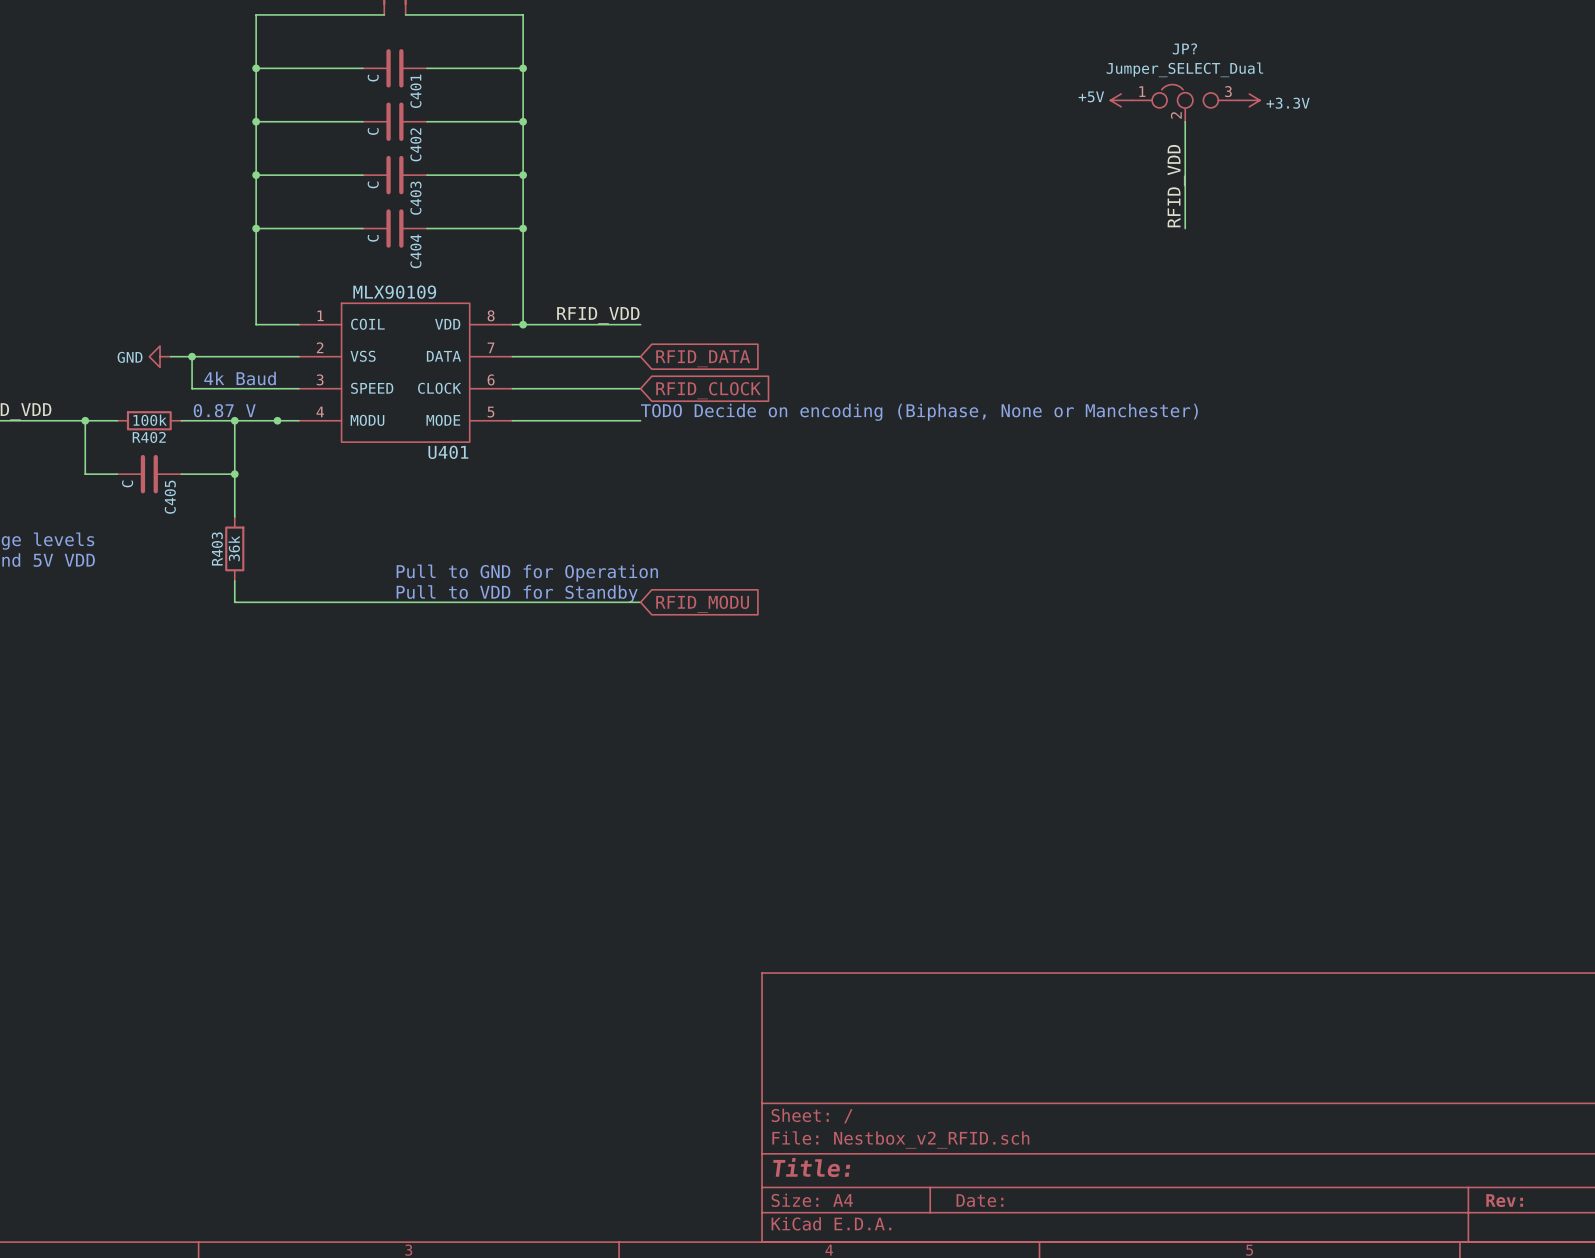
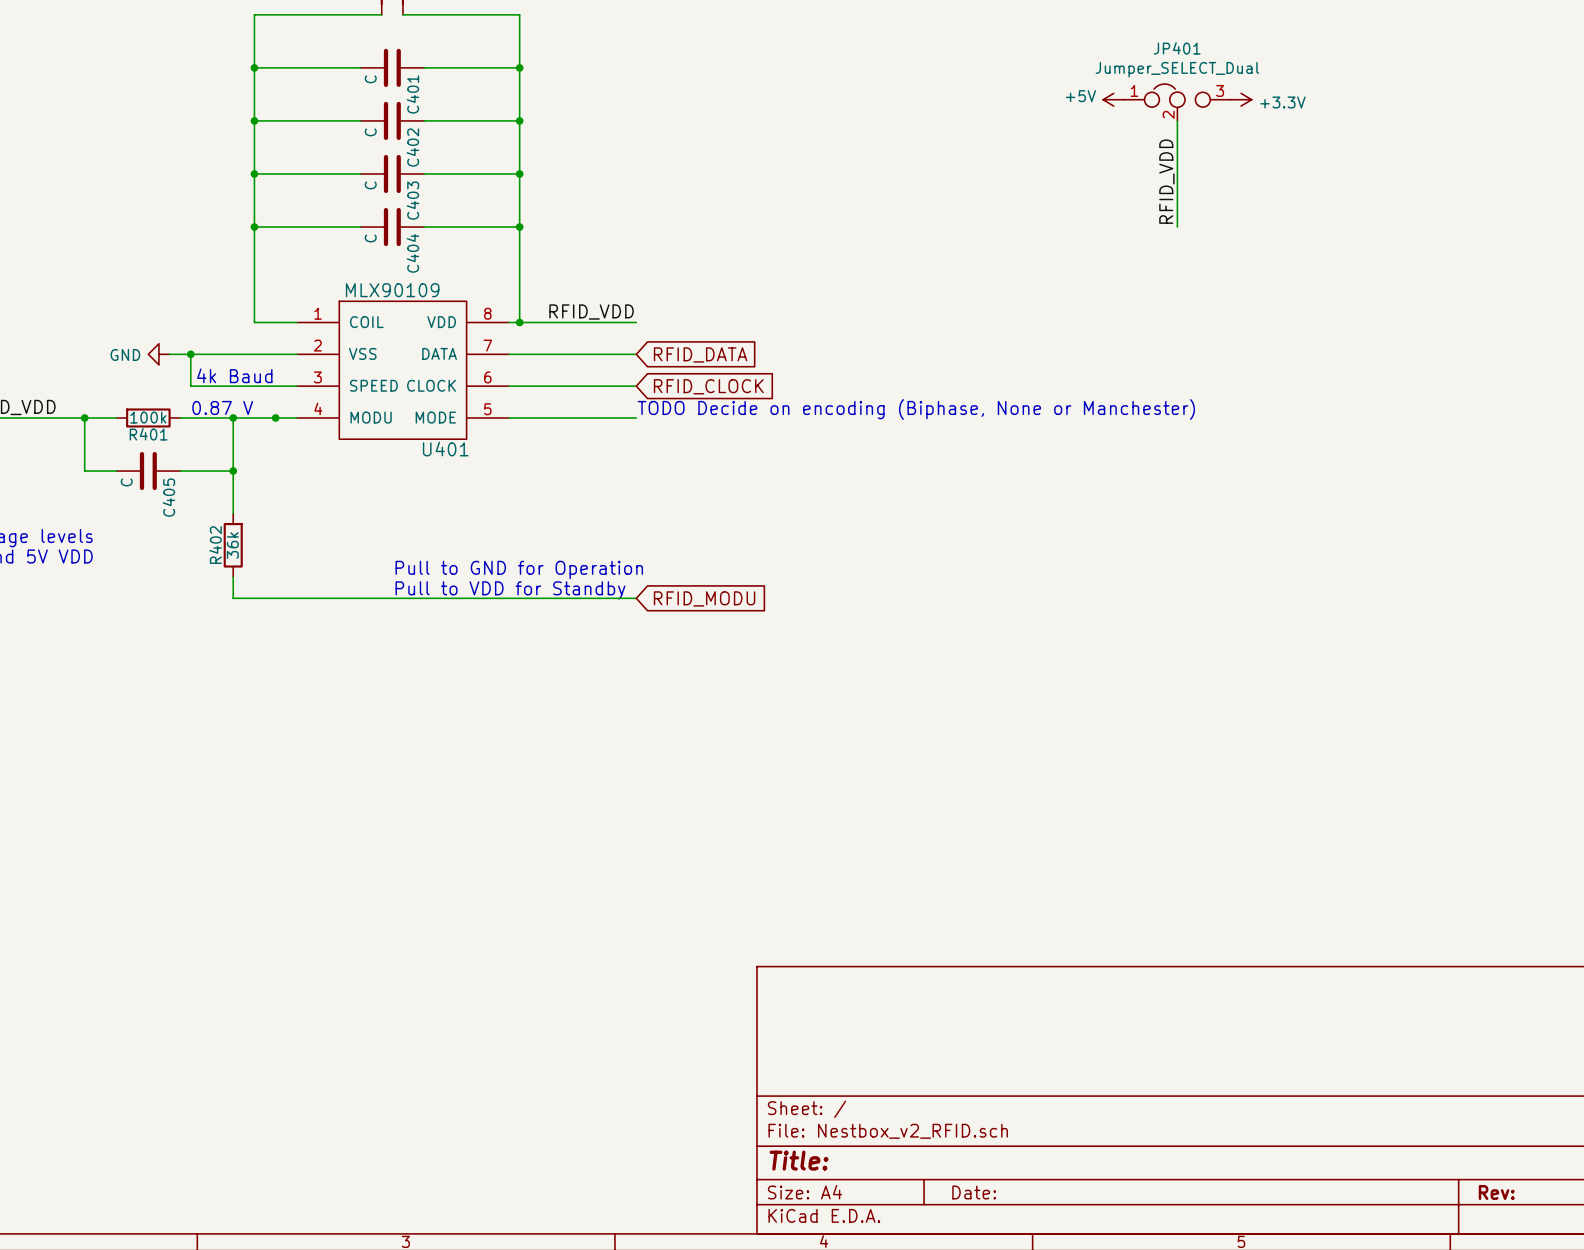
JP? name: JP? (1184, 48) -> JP401 (1177, 48)
R402 name: R402 (149, 437) -> R401 (148, 434)
R403 name: R403 (217, 548) -> R402 (215, 545)

